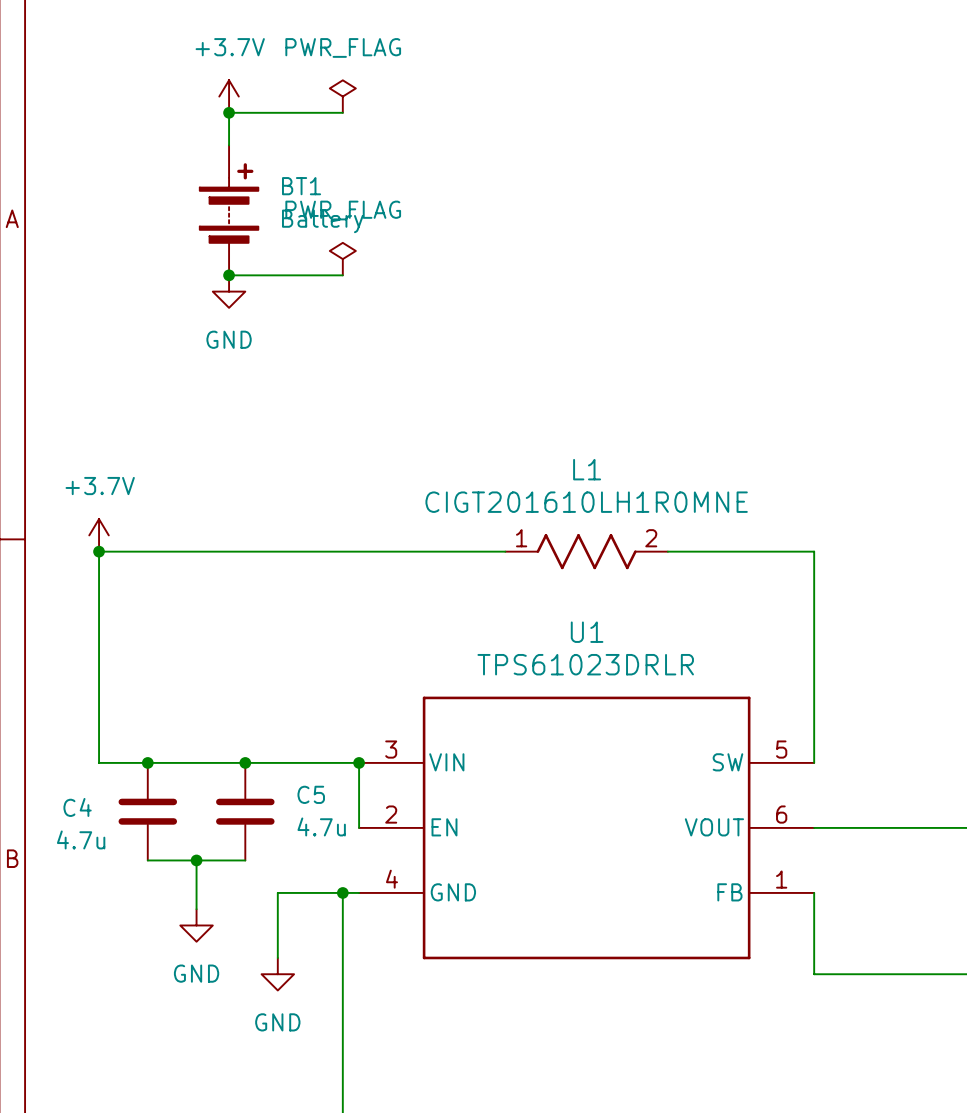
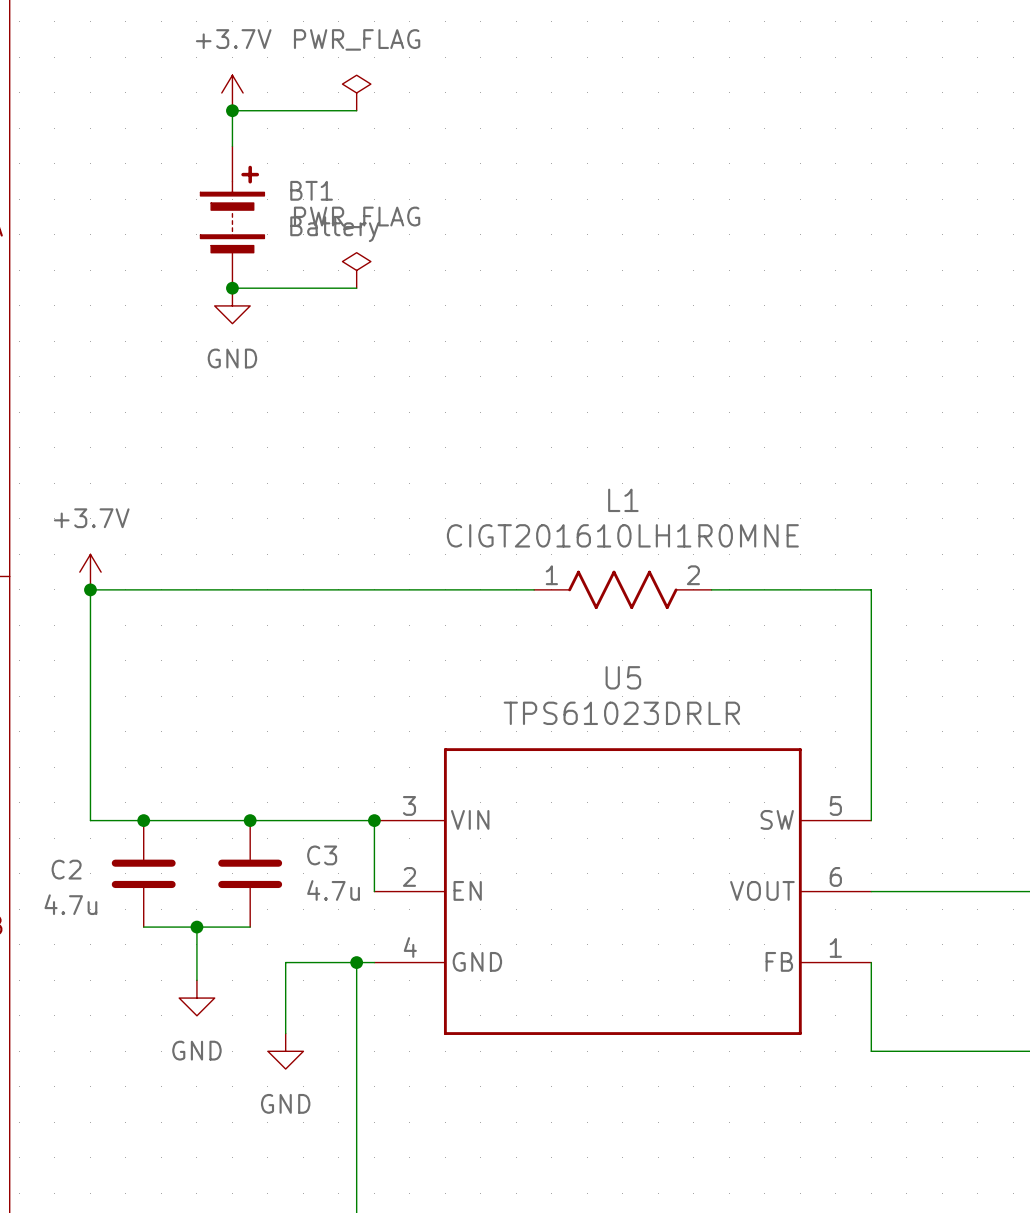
U1 name: U1 (587, 632) -> U5 (623, 677)
C5 name: C5 (311, 794) -> C3 (322, 855)
C4 name: C4 (77, 807) -> C2 (66, 869)

